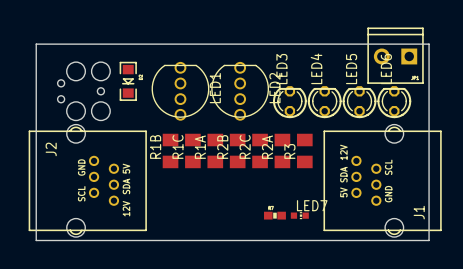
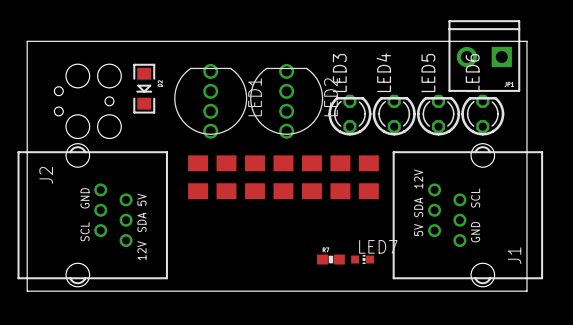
R1B name: R1B (155, 146) -> none
R1C name: R1C (177, 146) -> none
R2B name: R2B (222, 146) -> none
R2C name: R2C (245, 146) -> none
R1A name: R1A (200, 147) -> none
R2A name: R2A (267, 147) -> none
R3 name: R3 (289, 151) -> none

